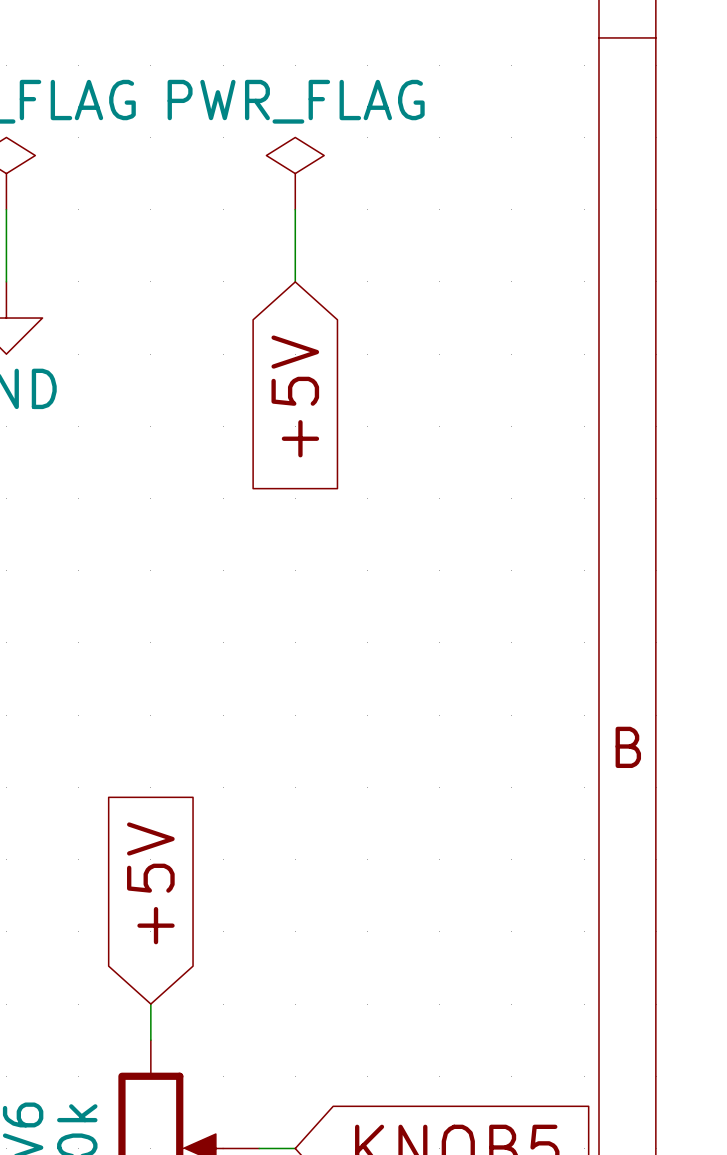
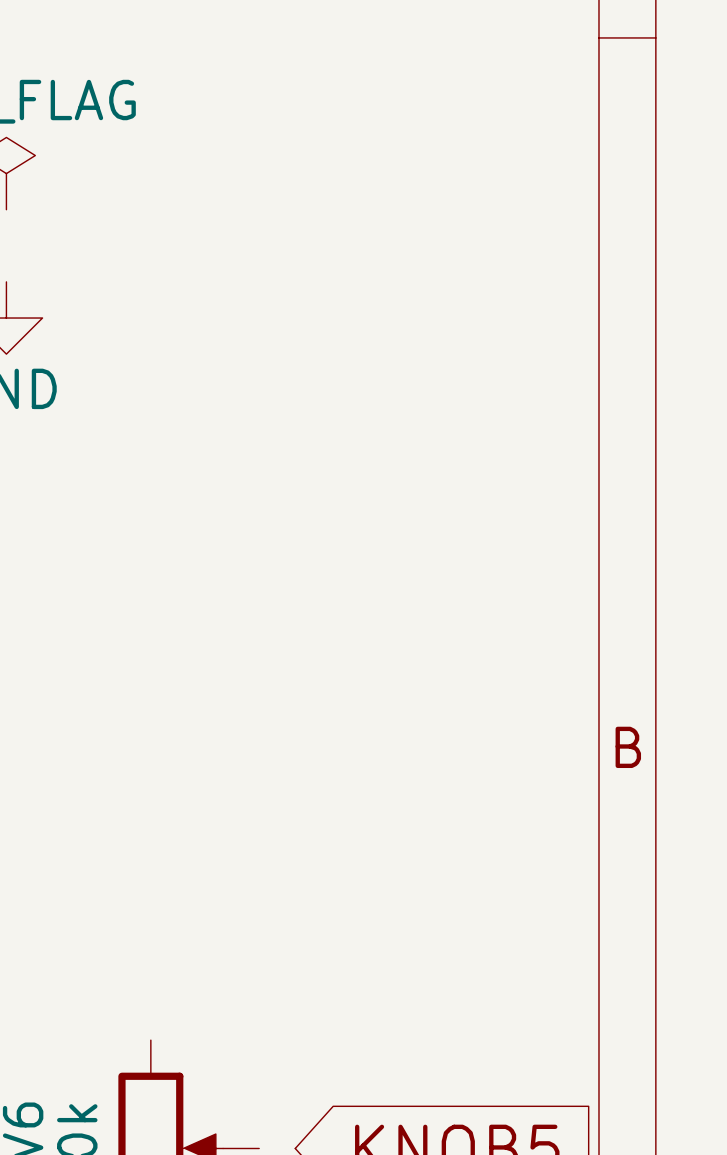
power symbol: PWR_FLAG (295, 173) -> none
wire: (6, 209) (6, 281) -> none
wire: (295, 209) (295, 281) -> none
global label: +5V (295, 396) -> none
global label: +5V (150, 883) -> none
wire: (150, 1004) (150, 1040) -> none
wire: (259, 1148) (295, 1148) -> none

